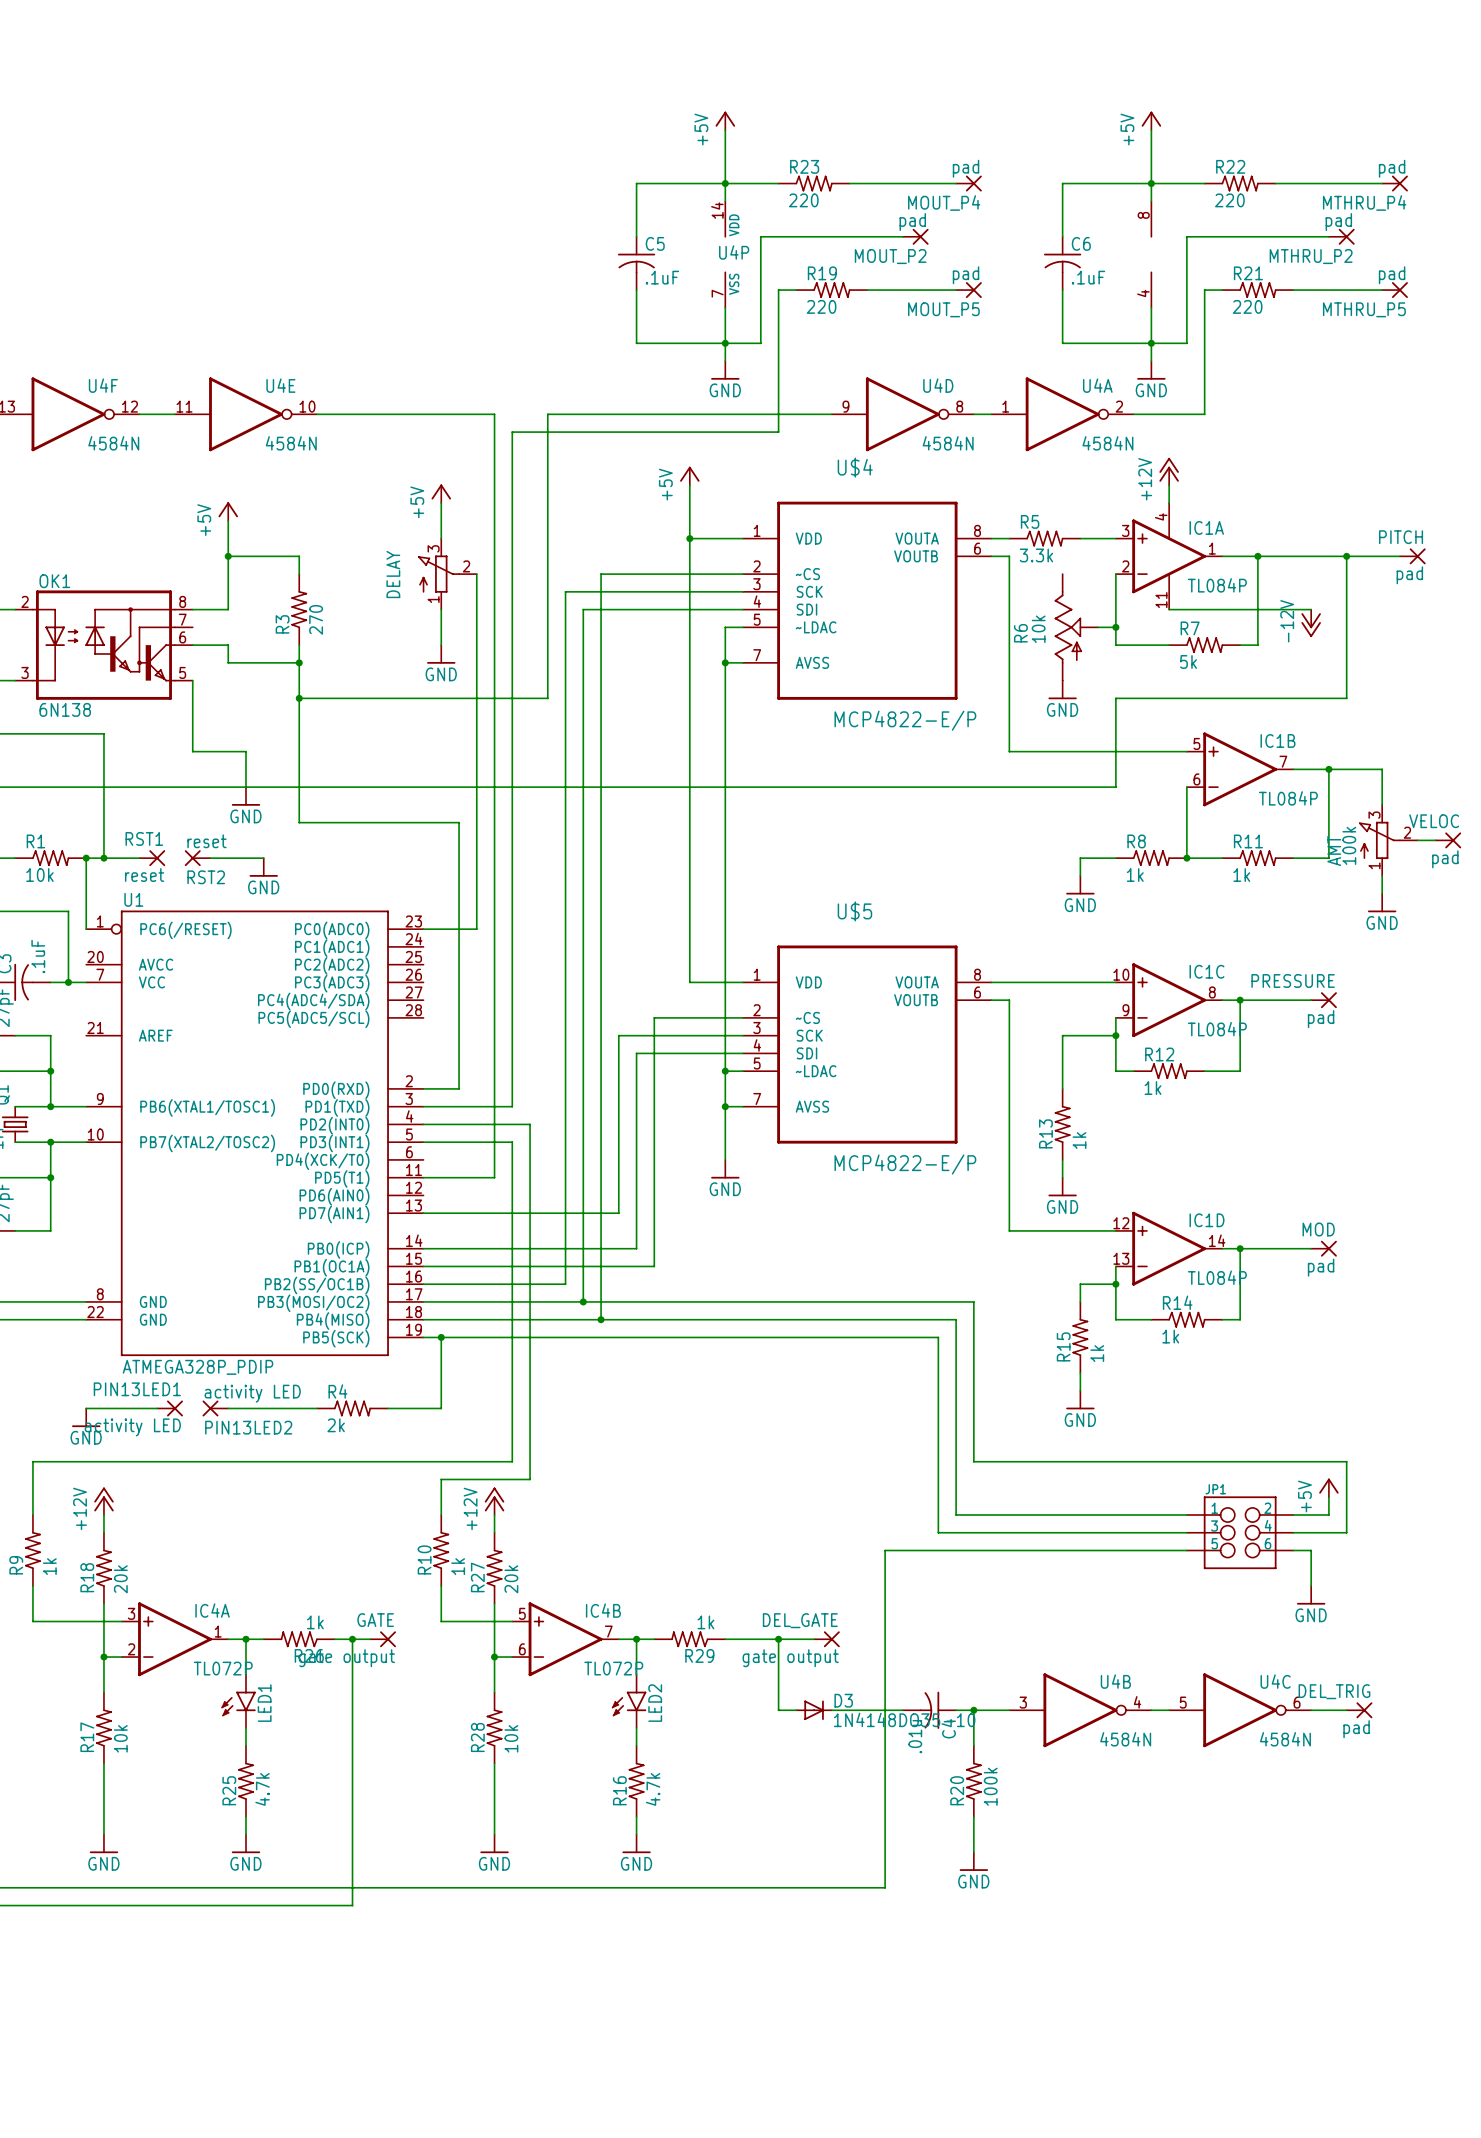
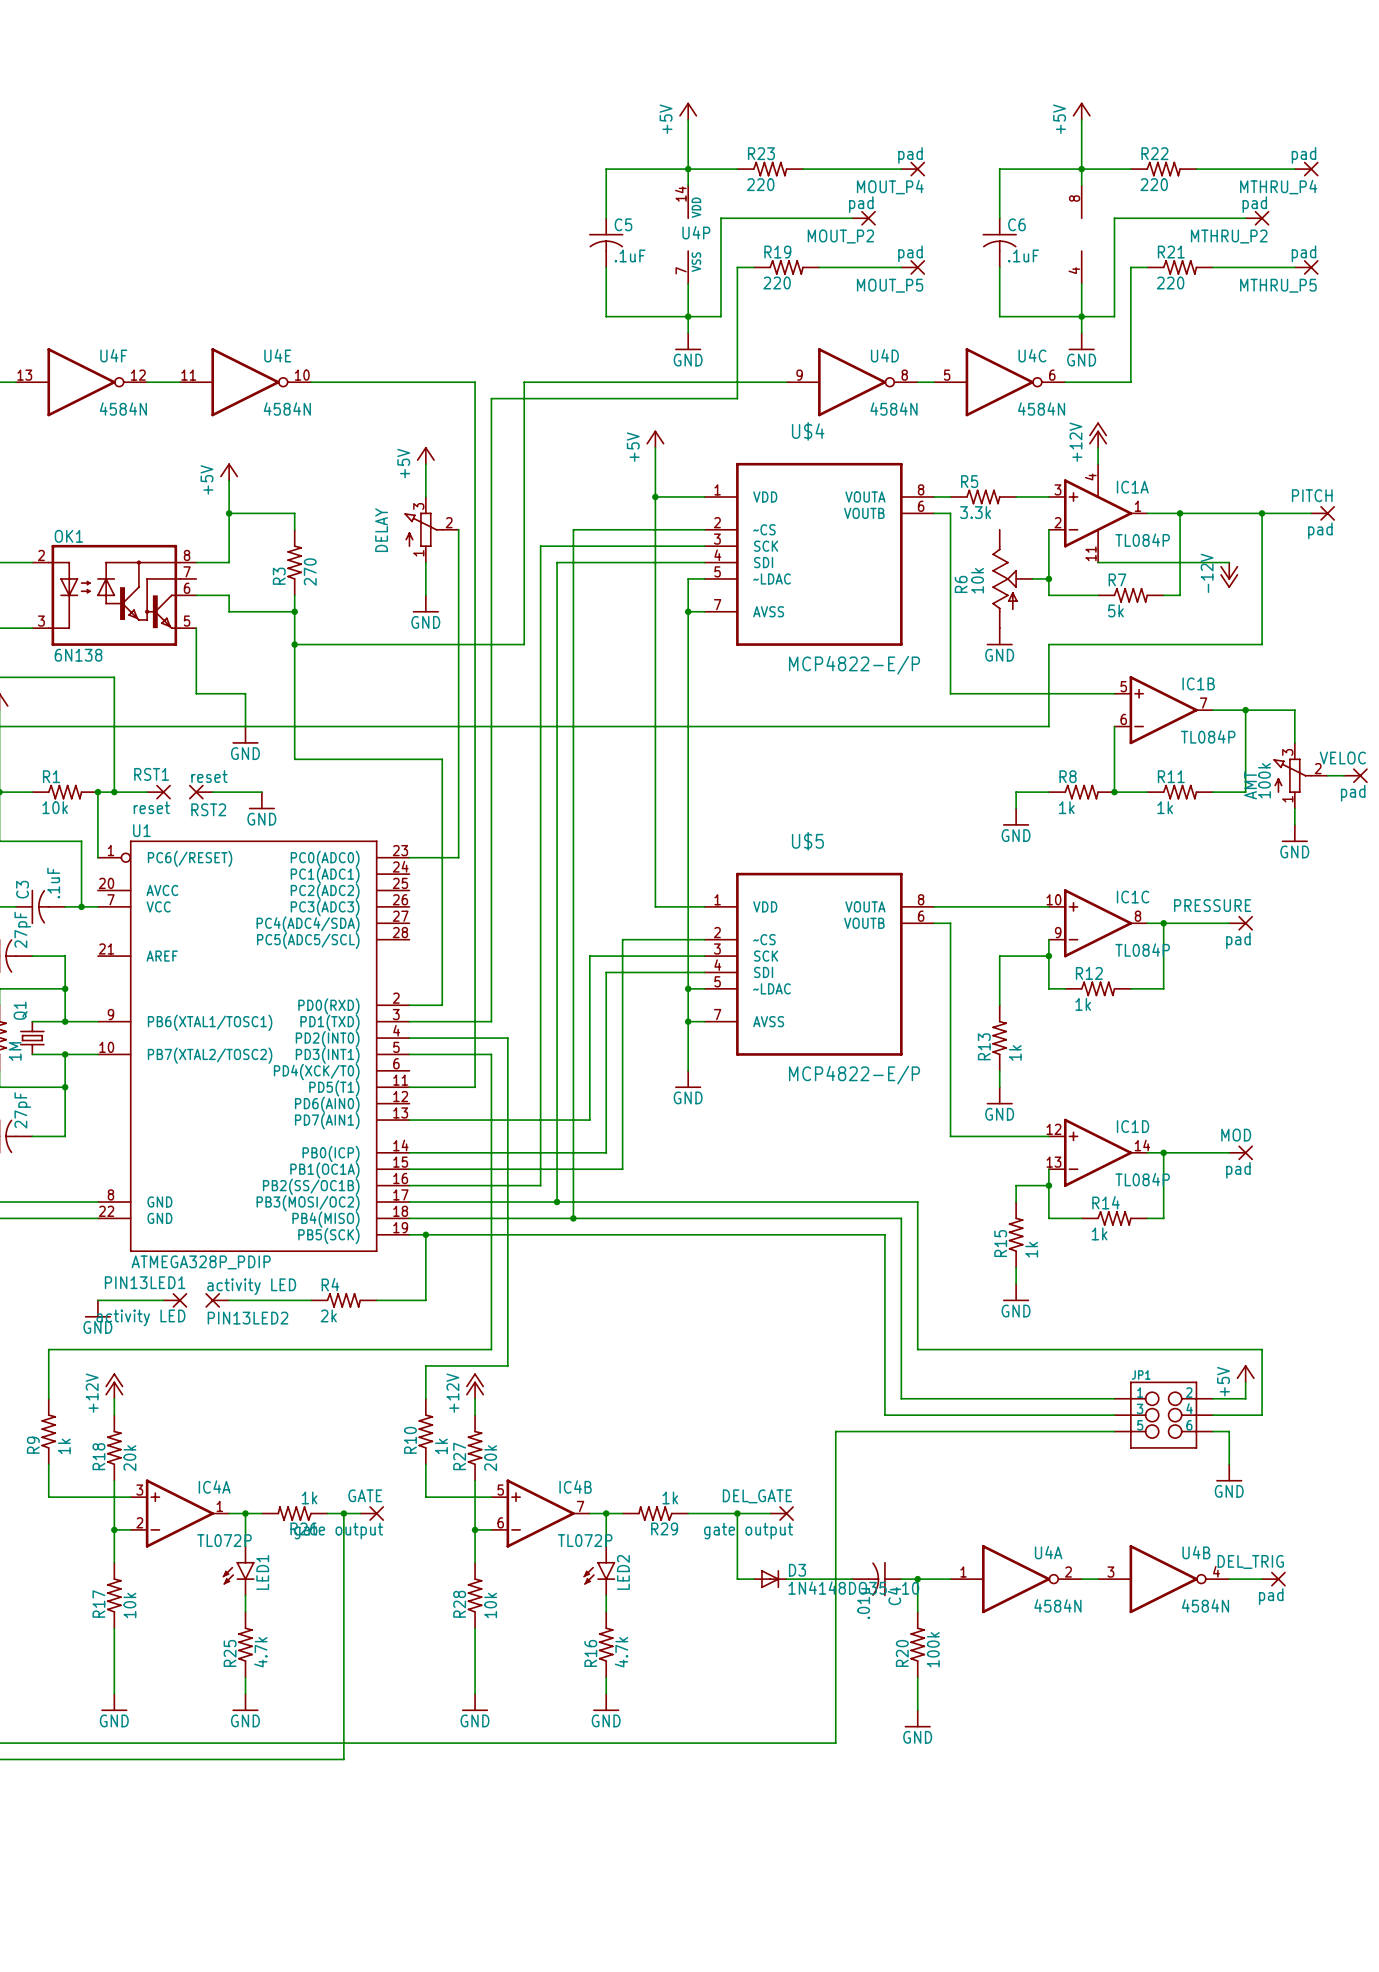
U4A position: (1062, 414) -> (1016, 1579)
U4B position: (1080, 1710) -> (1163, 1579)
U4C position: (1240, 1710) -> (999, 382)

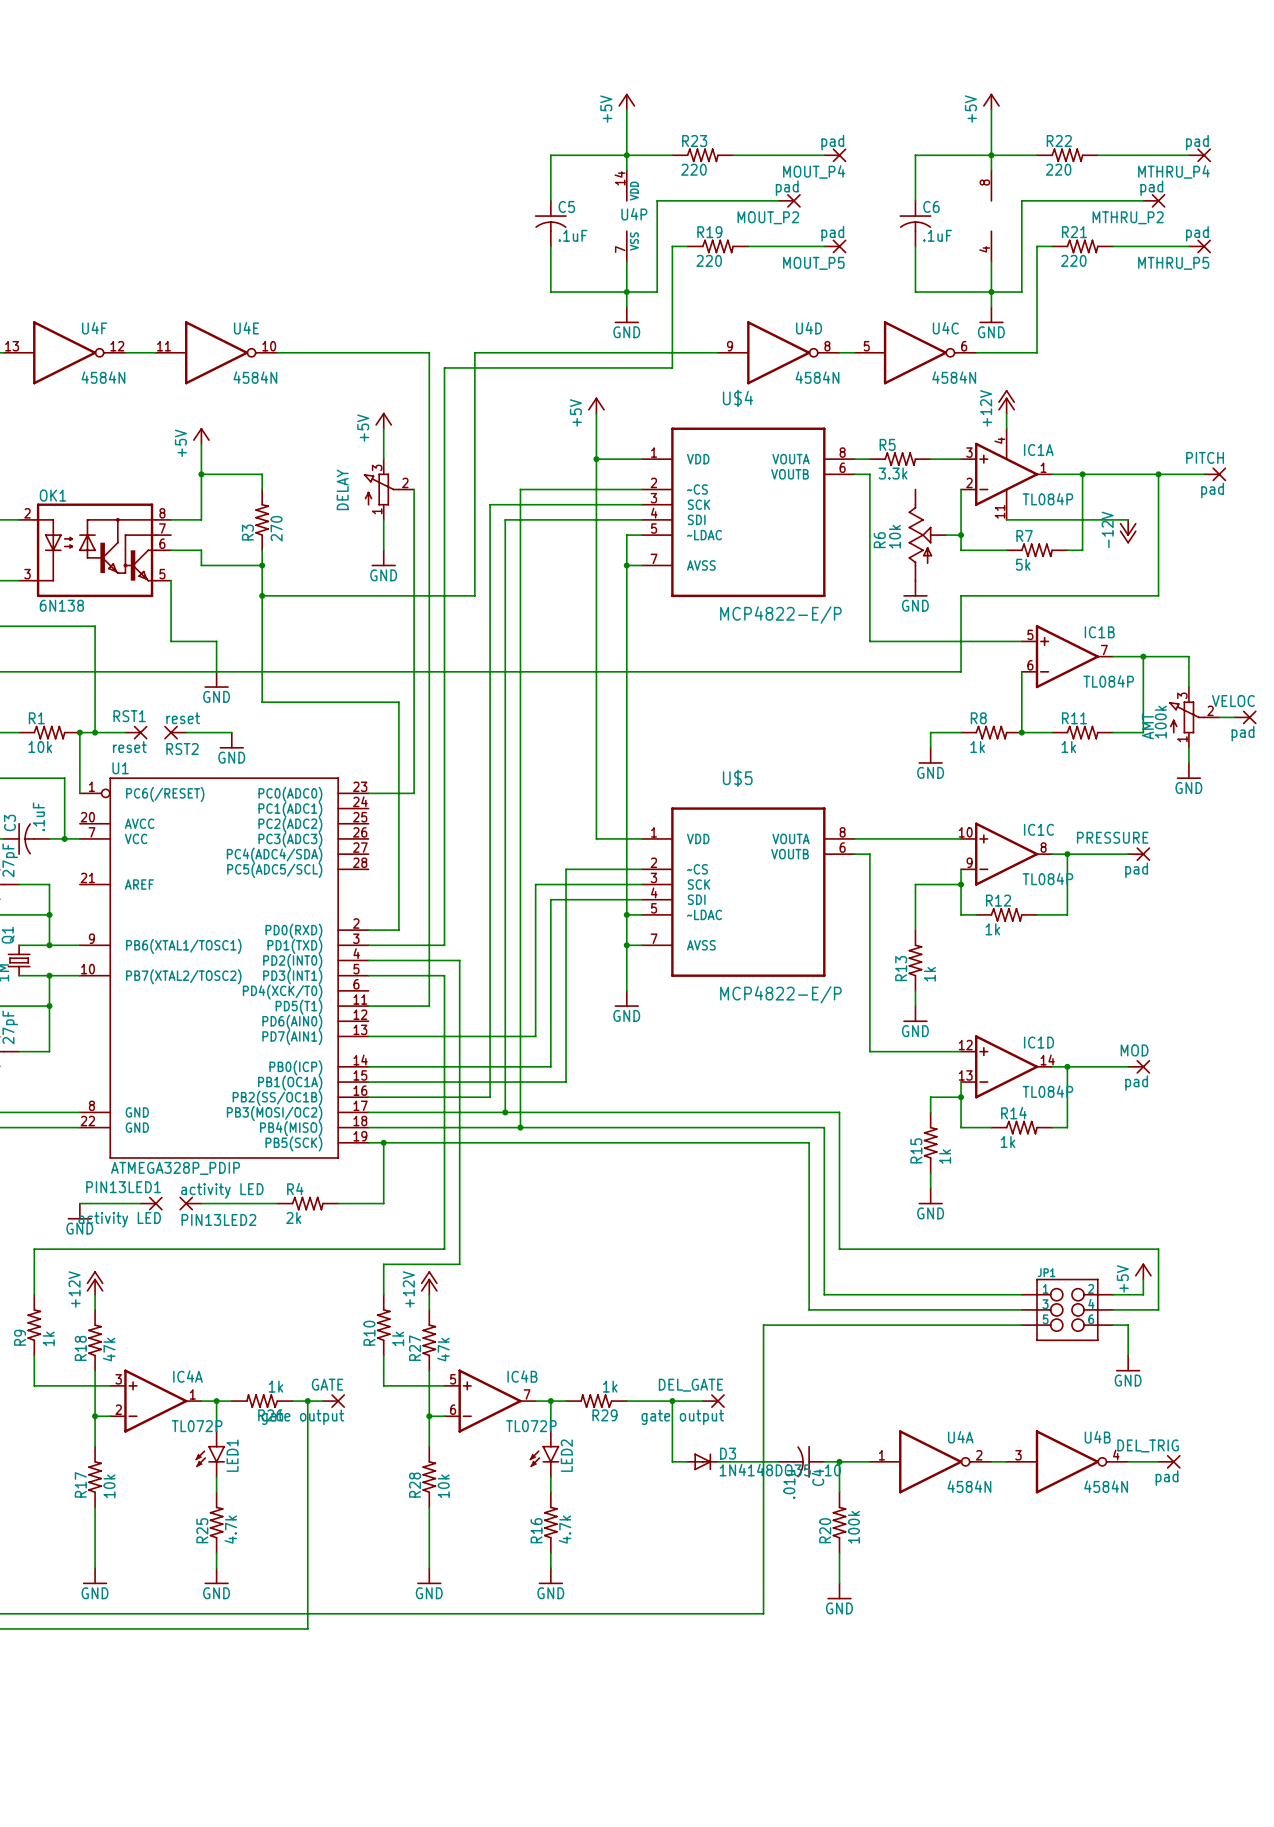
R18 value: 20k (129, 1458) -> 47k (109, 1349)
R27 value: 20k (490, 1458) -> 47k (443, 1349)

